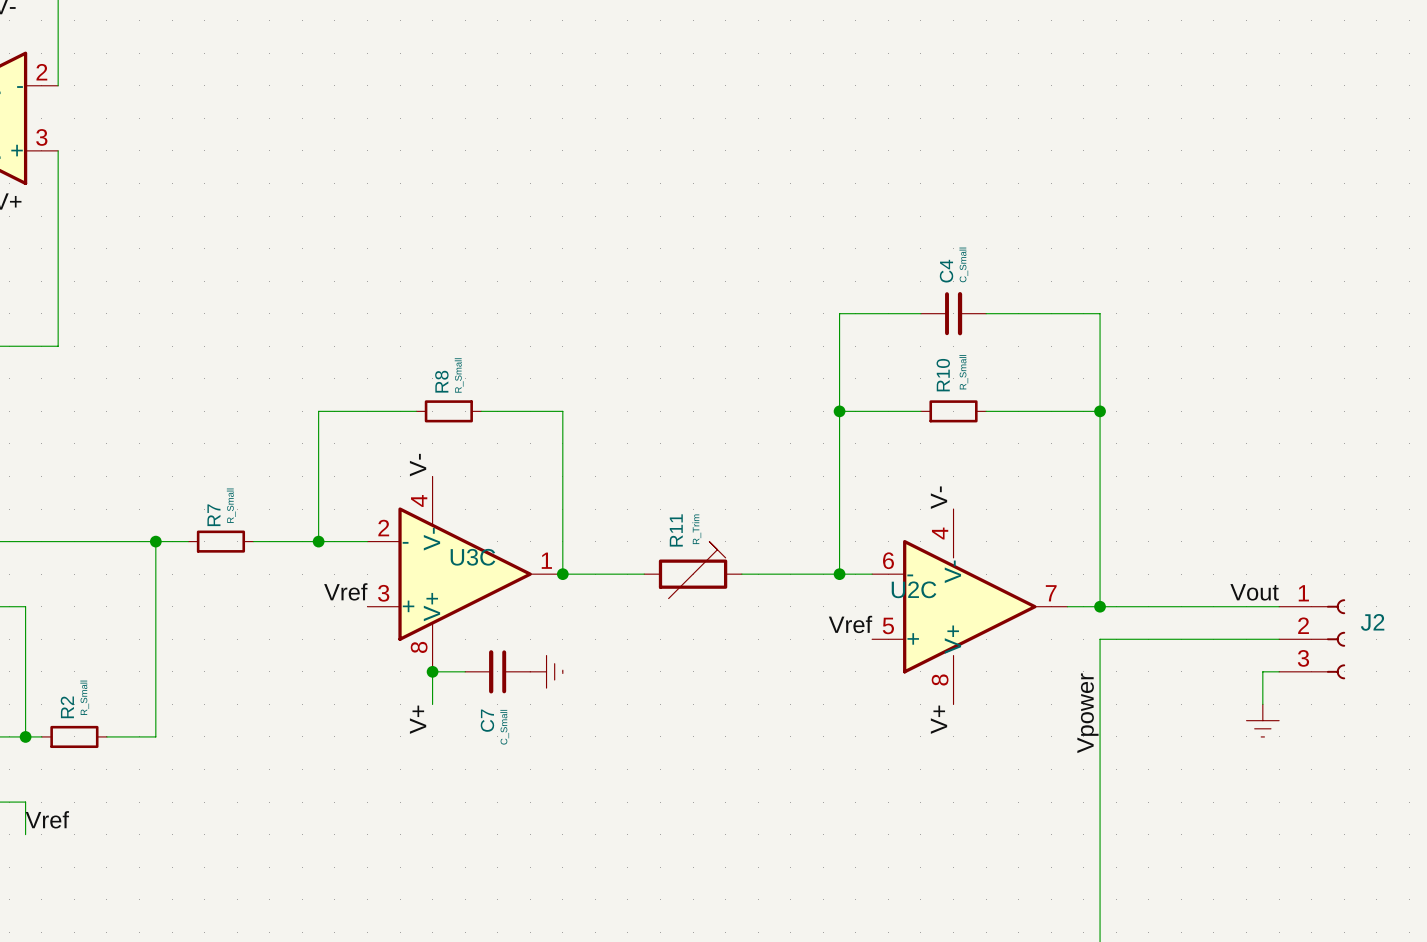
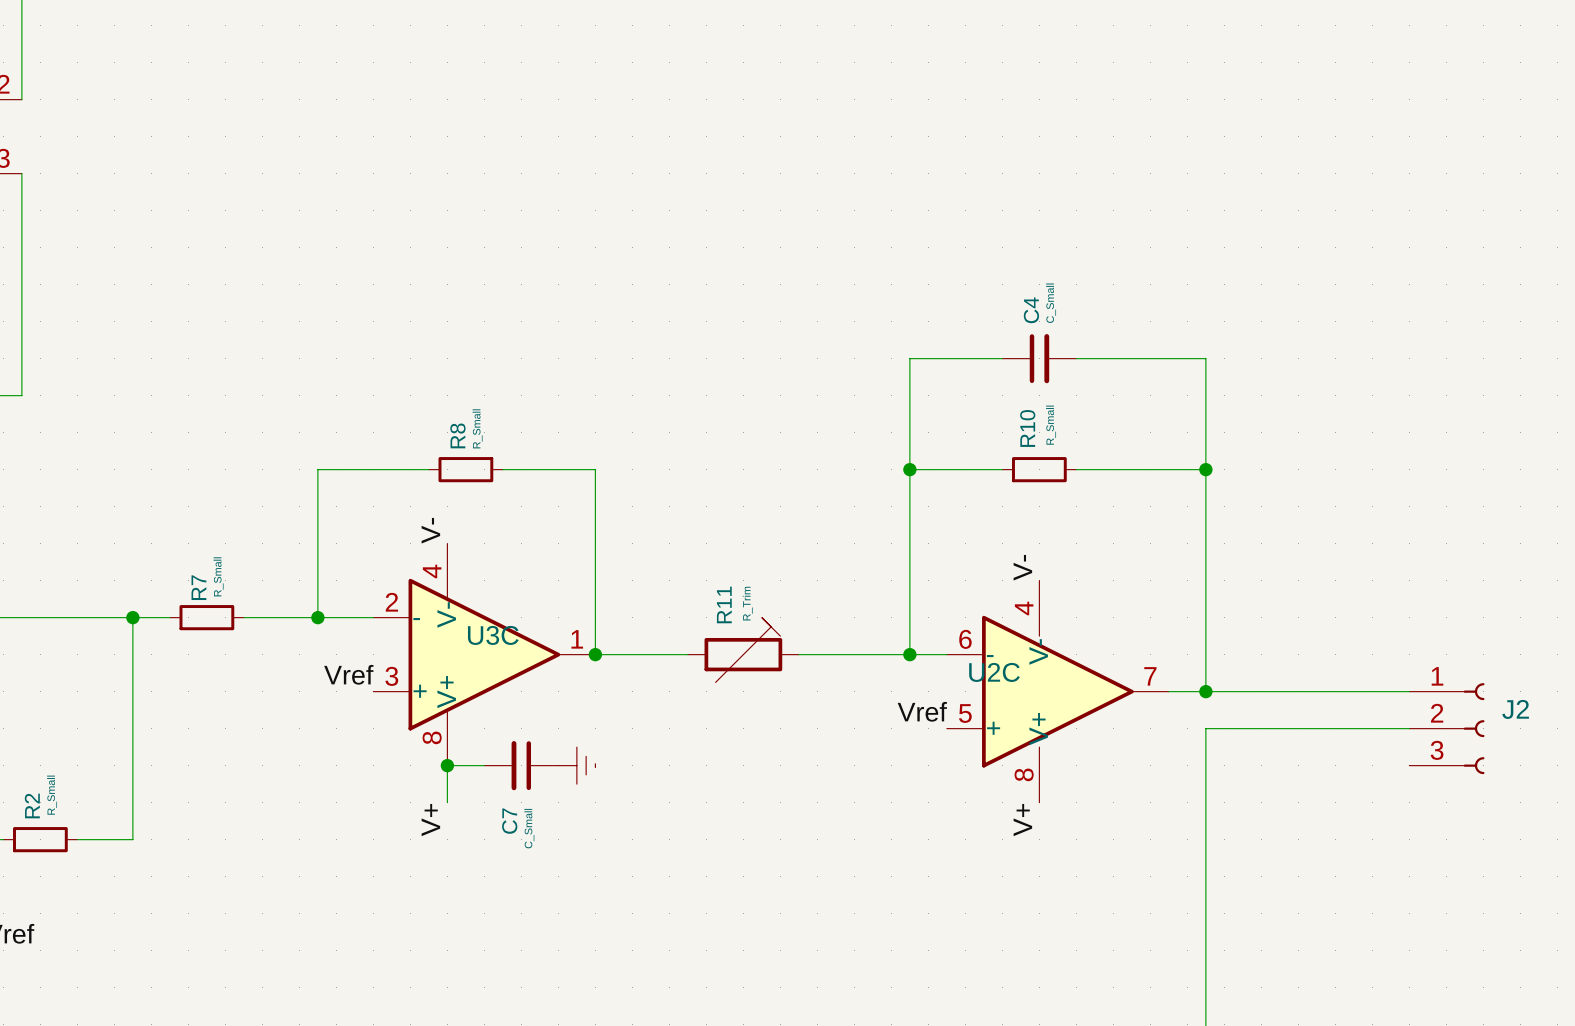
label: Vout (1254, 592) -> none
wire: (1279, 671) (1262, 671) (1262, 704) -> none
label: Vpower (1087, 713) -> none
power symbol: (1262, 720) -> none

